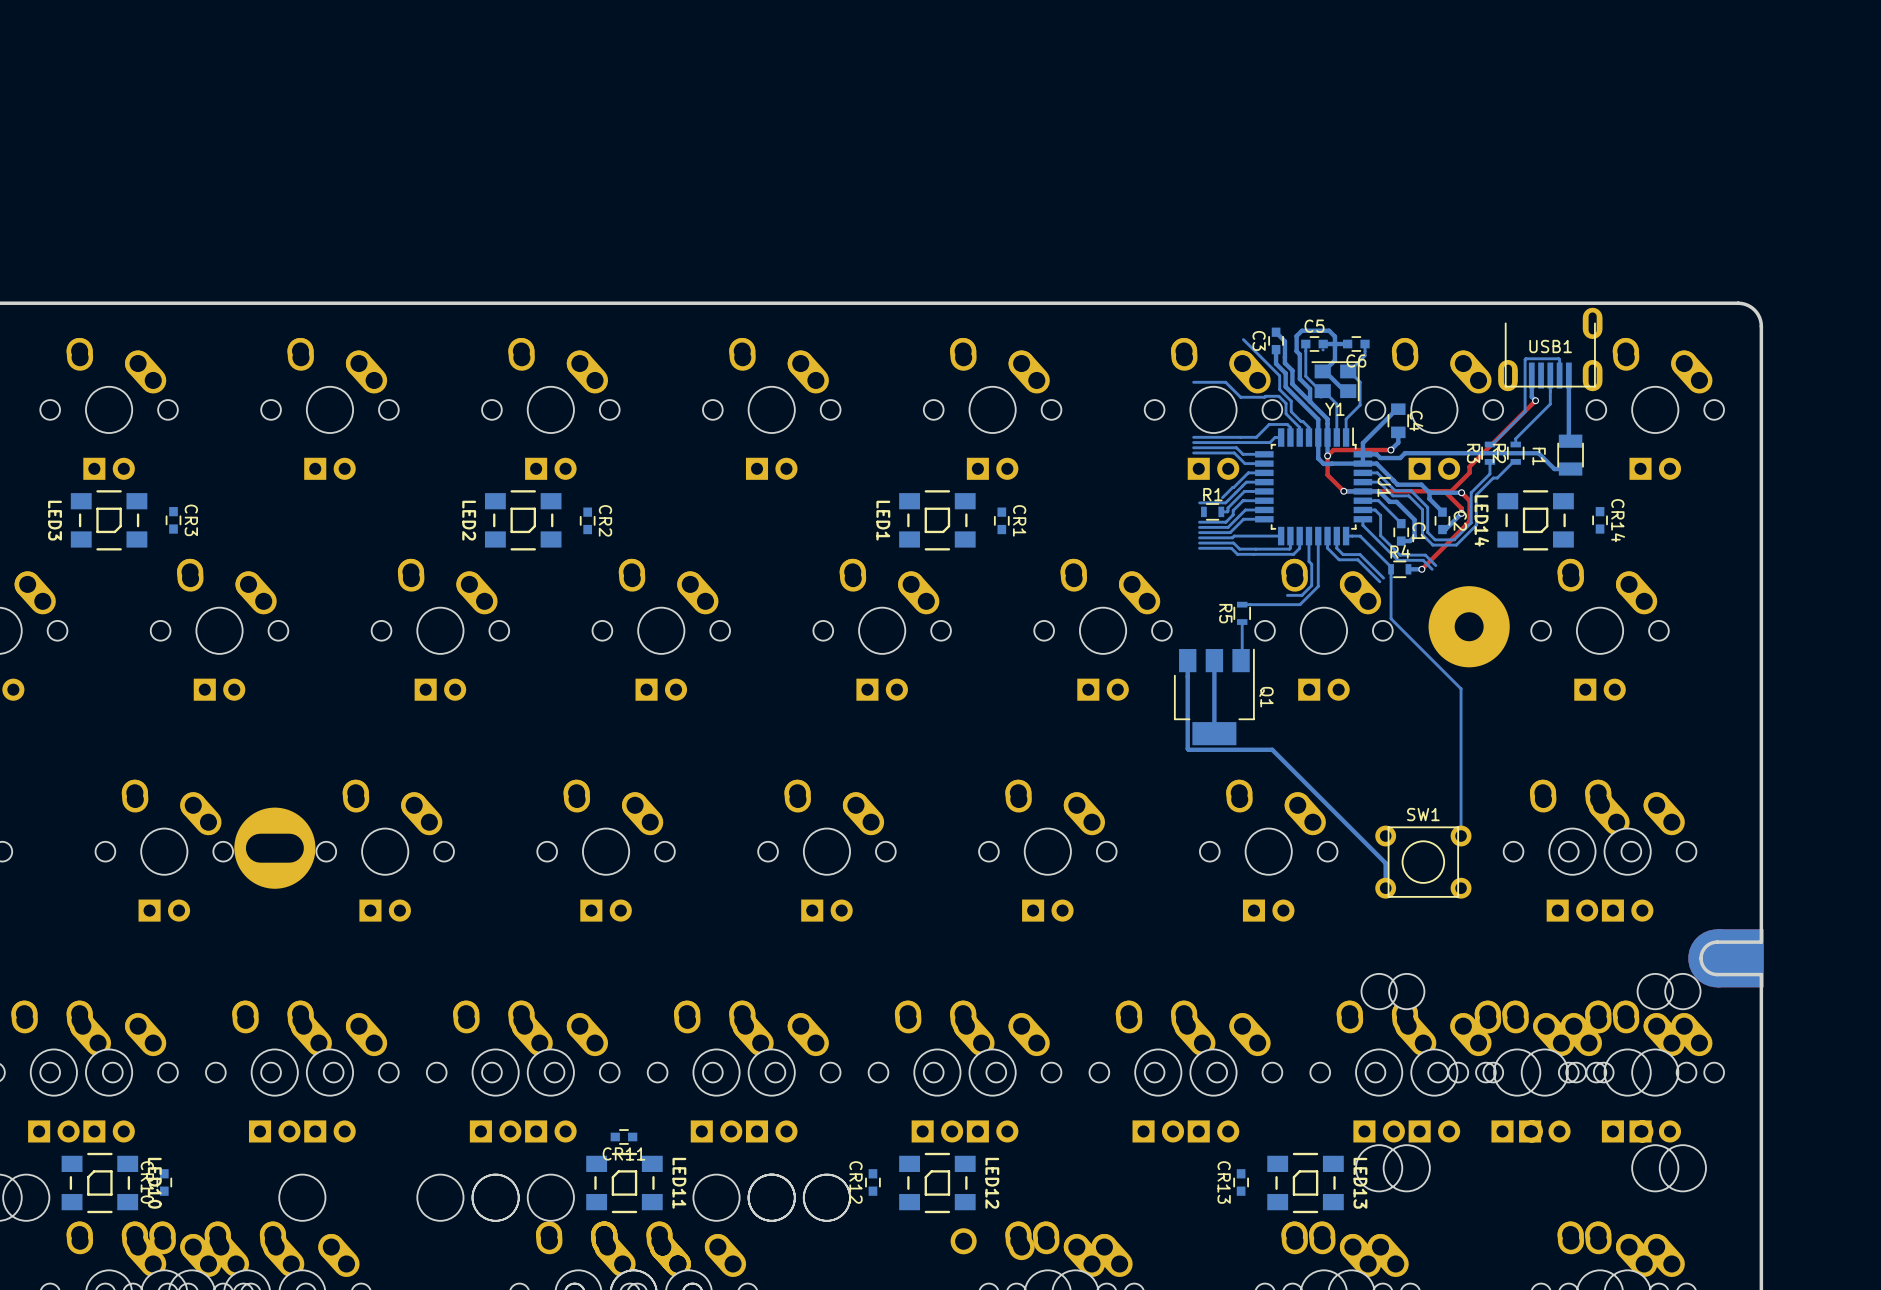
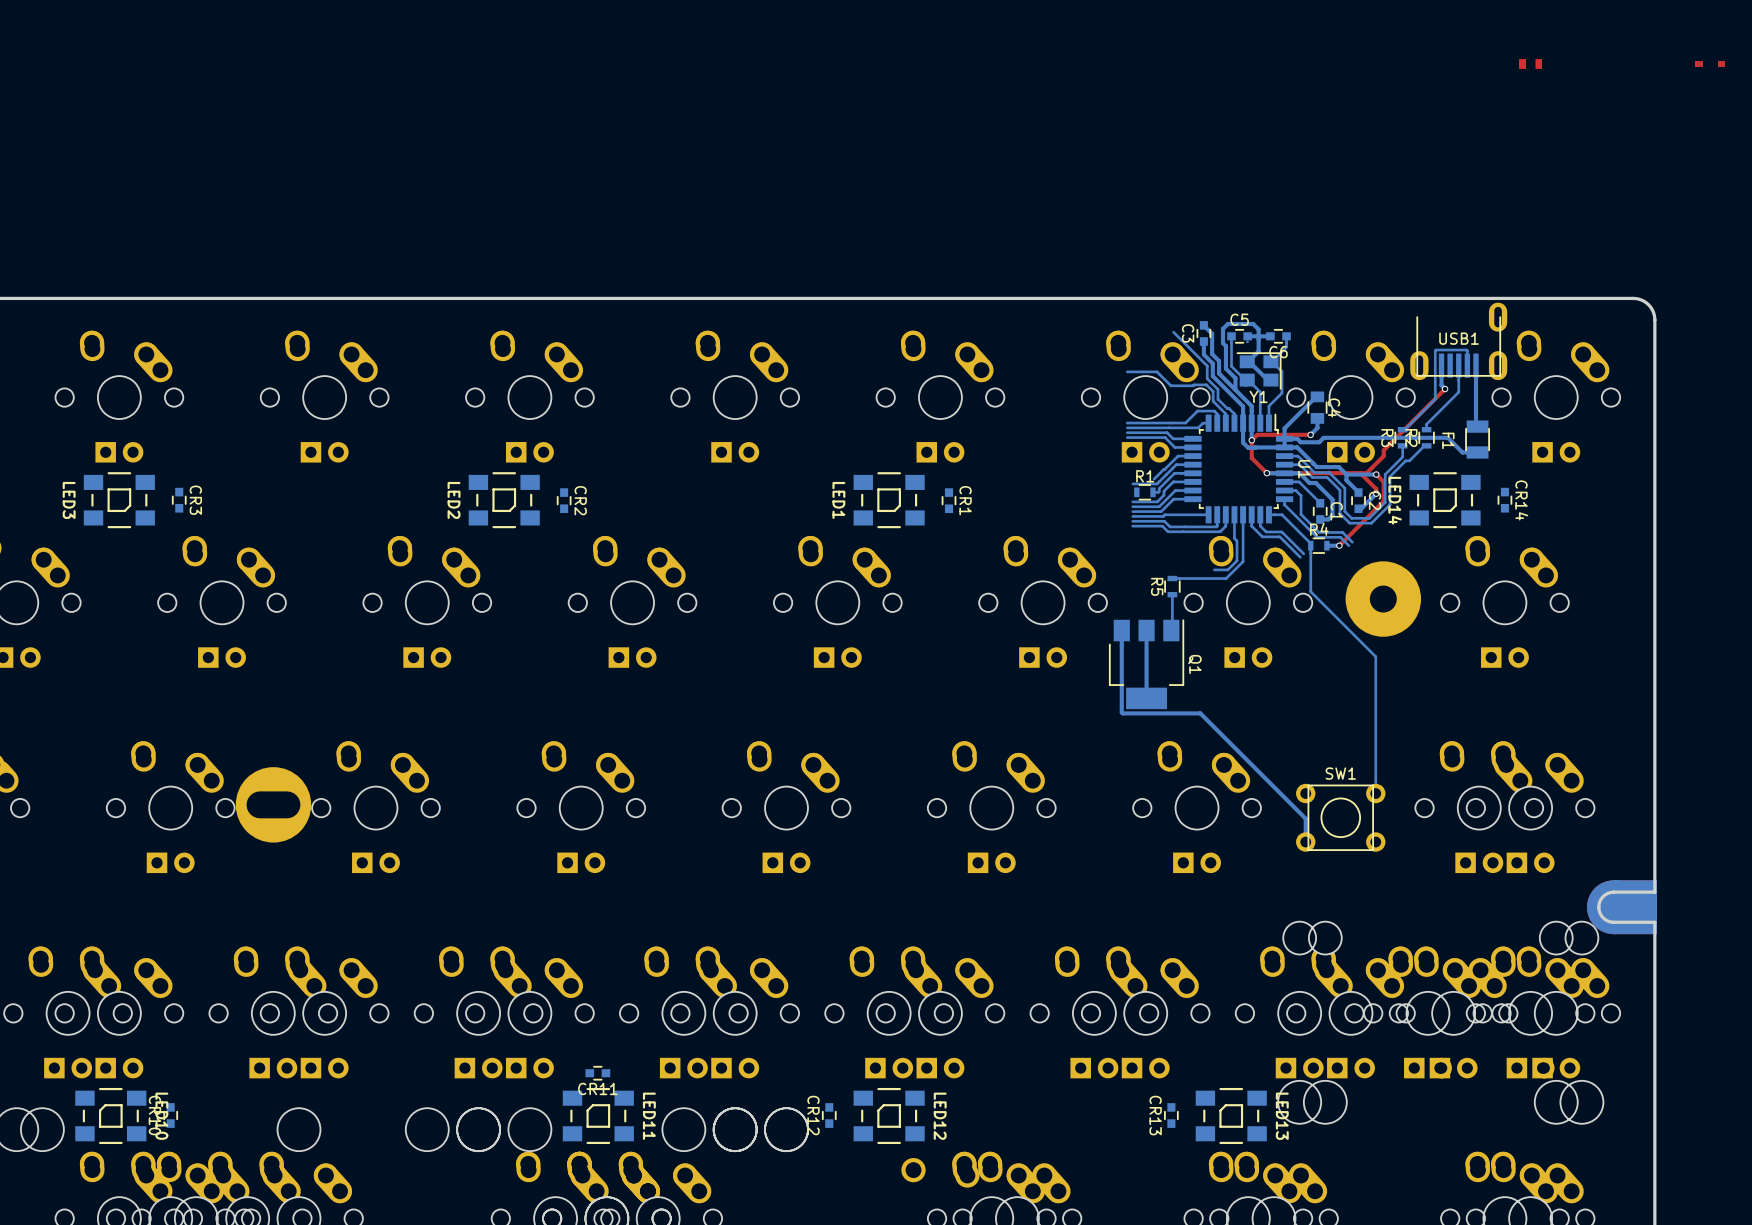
part: none -> (1530, 63)
part: none -> (1710, 63)

